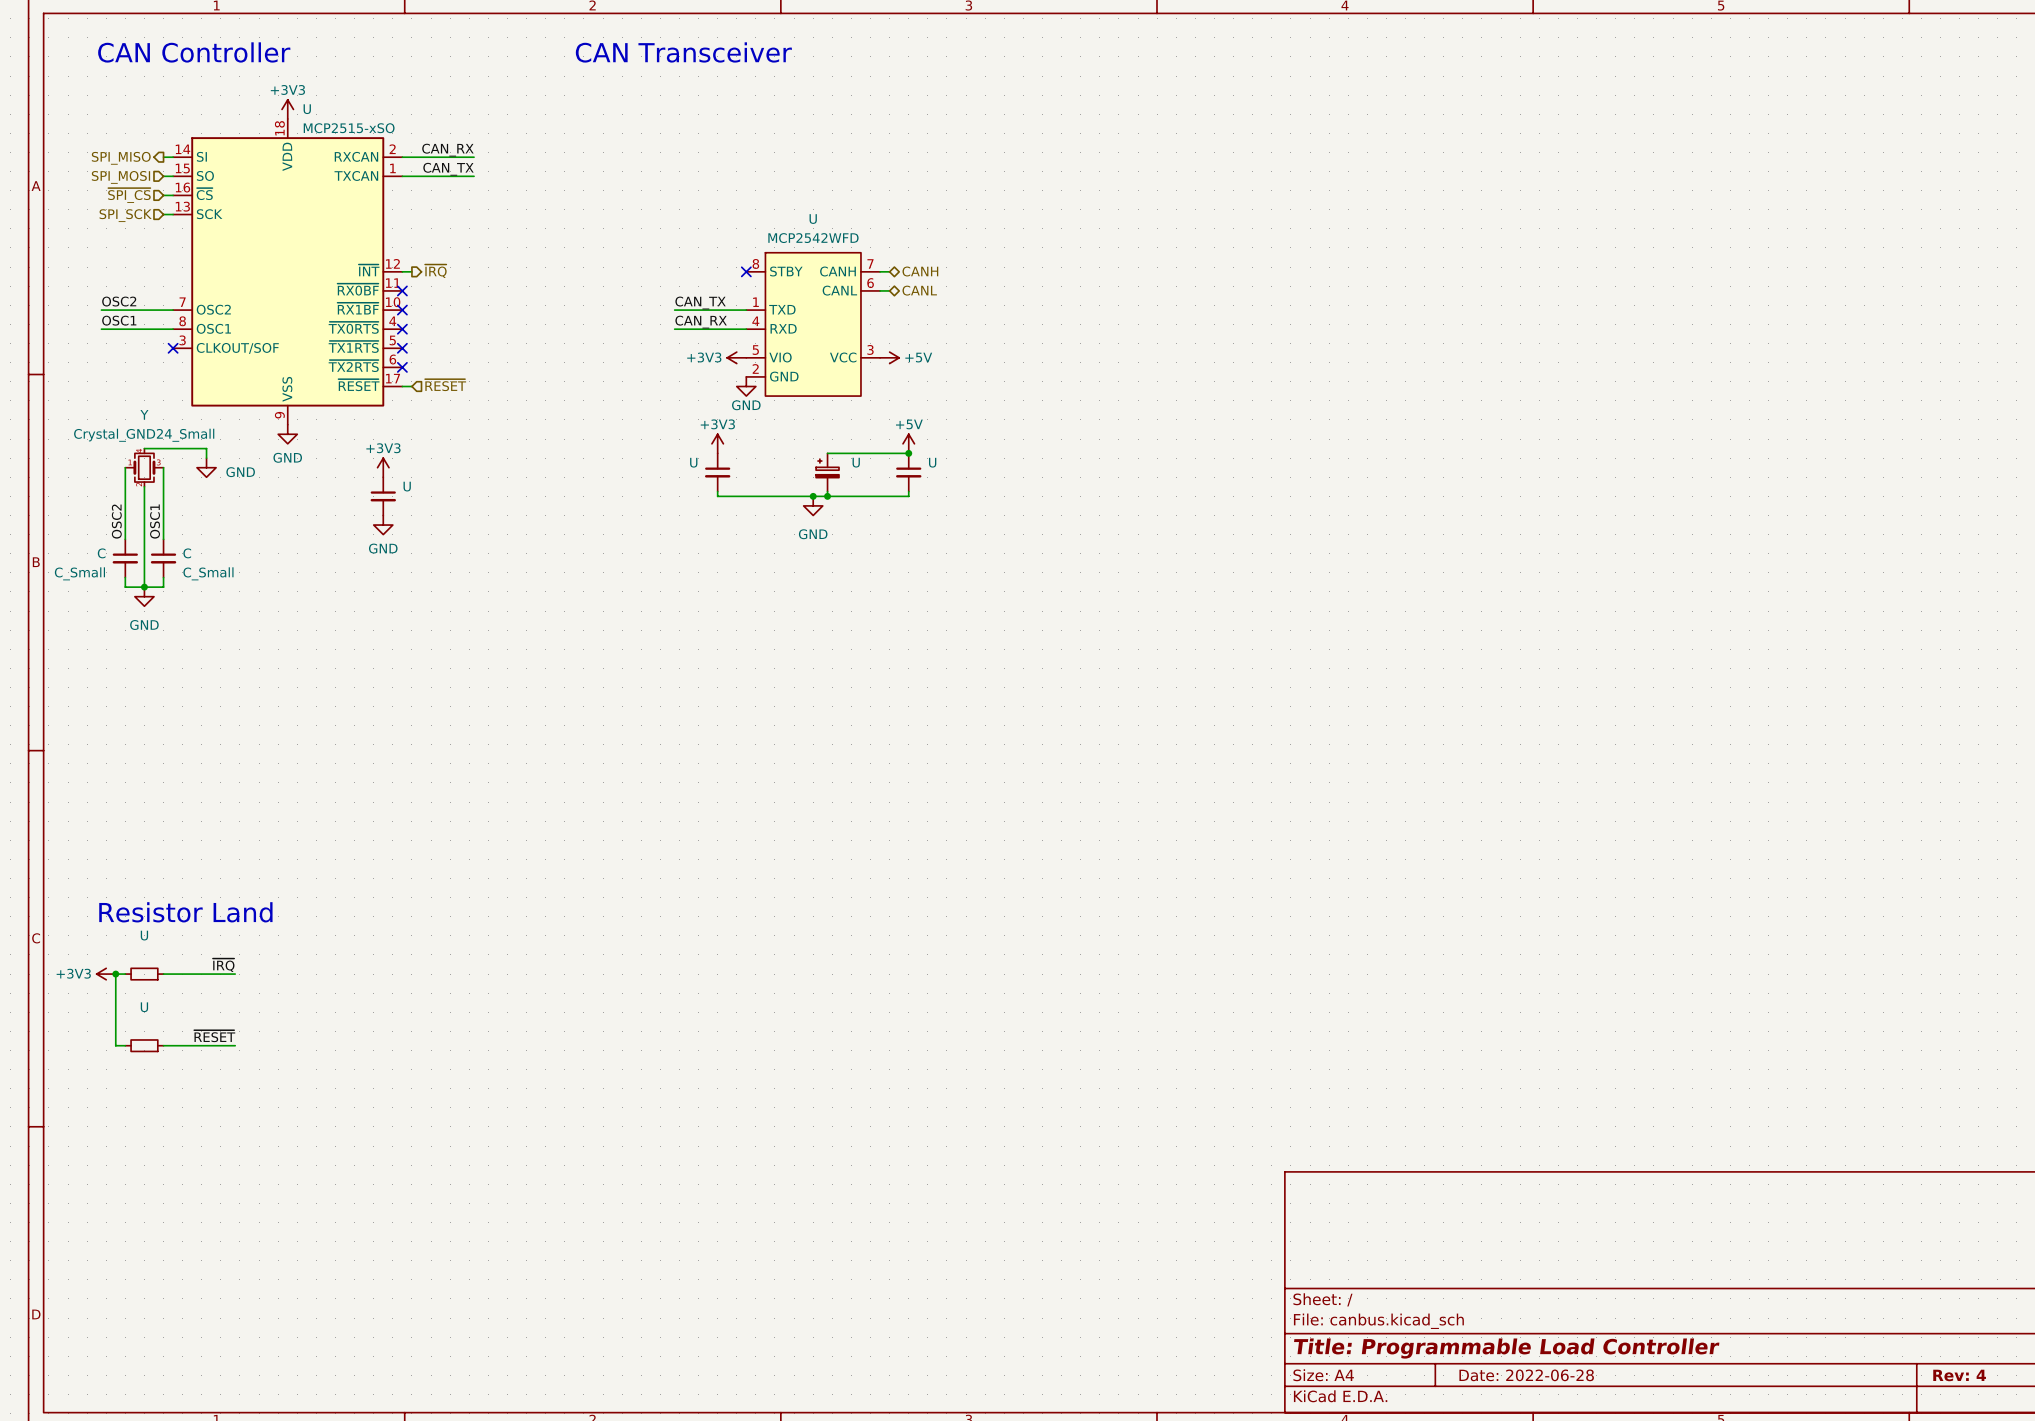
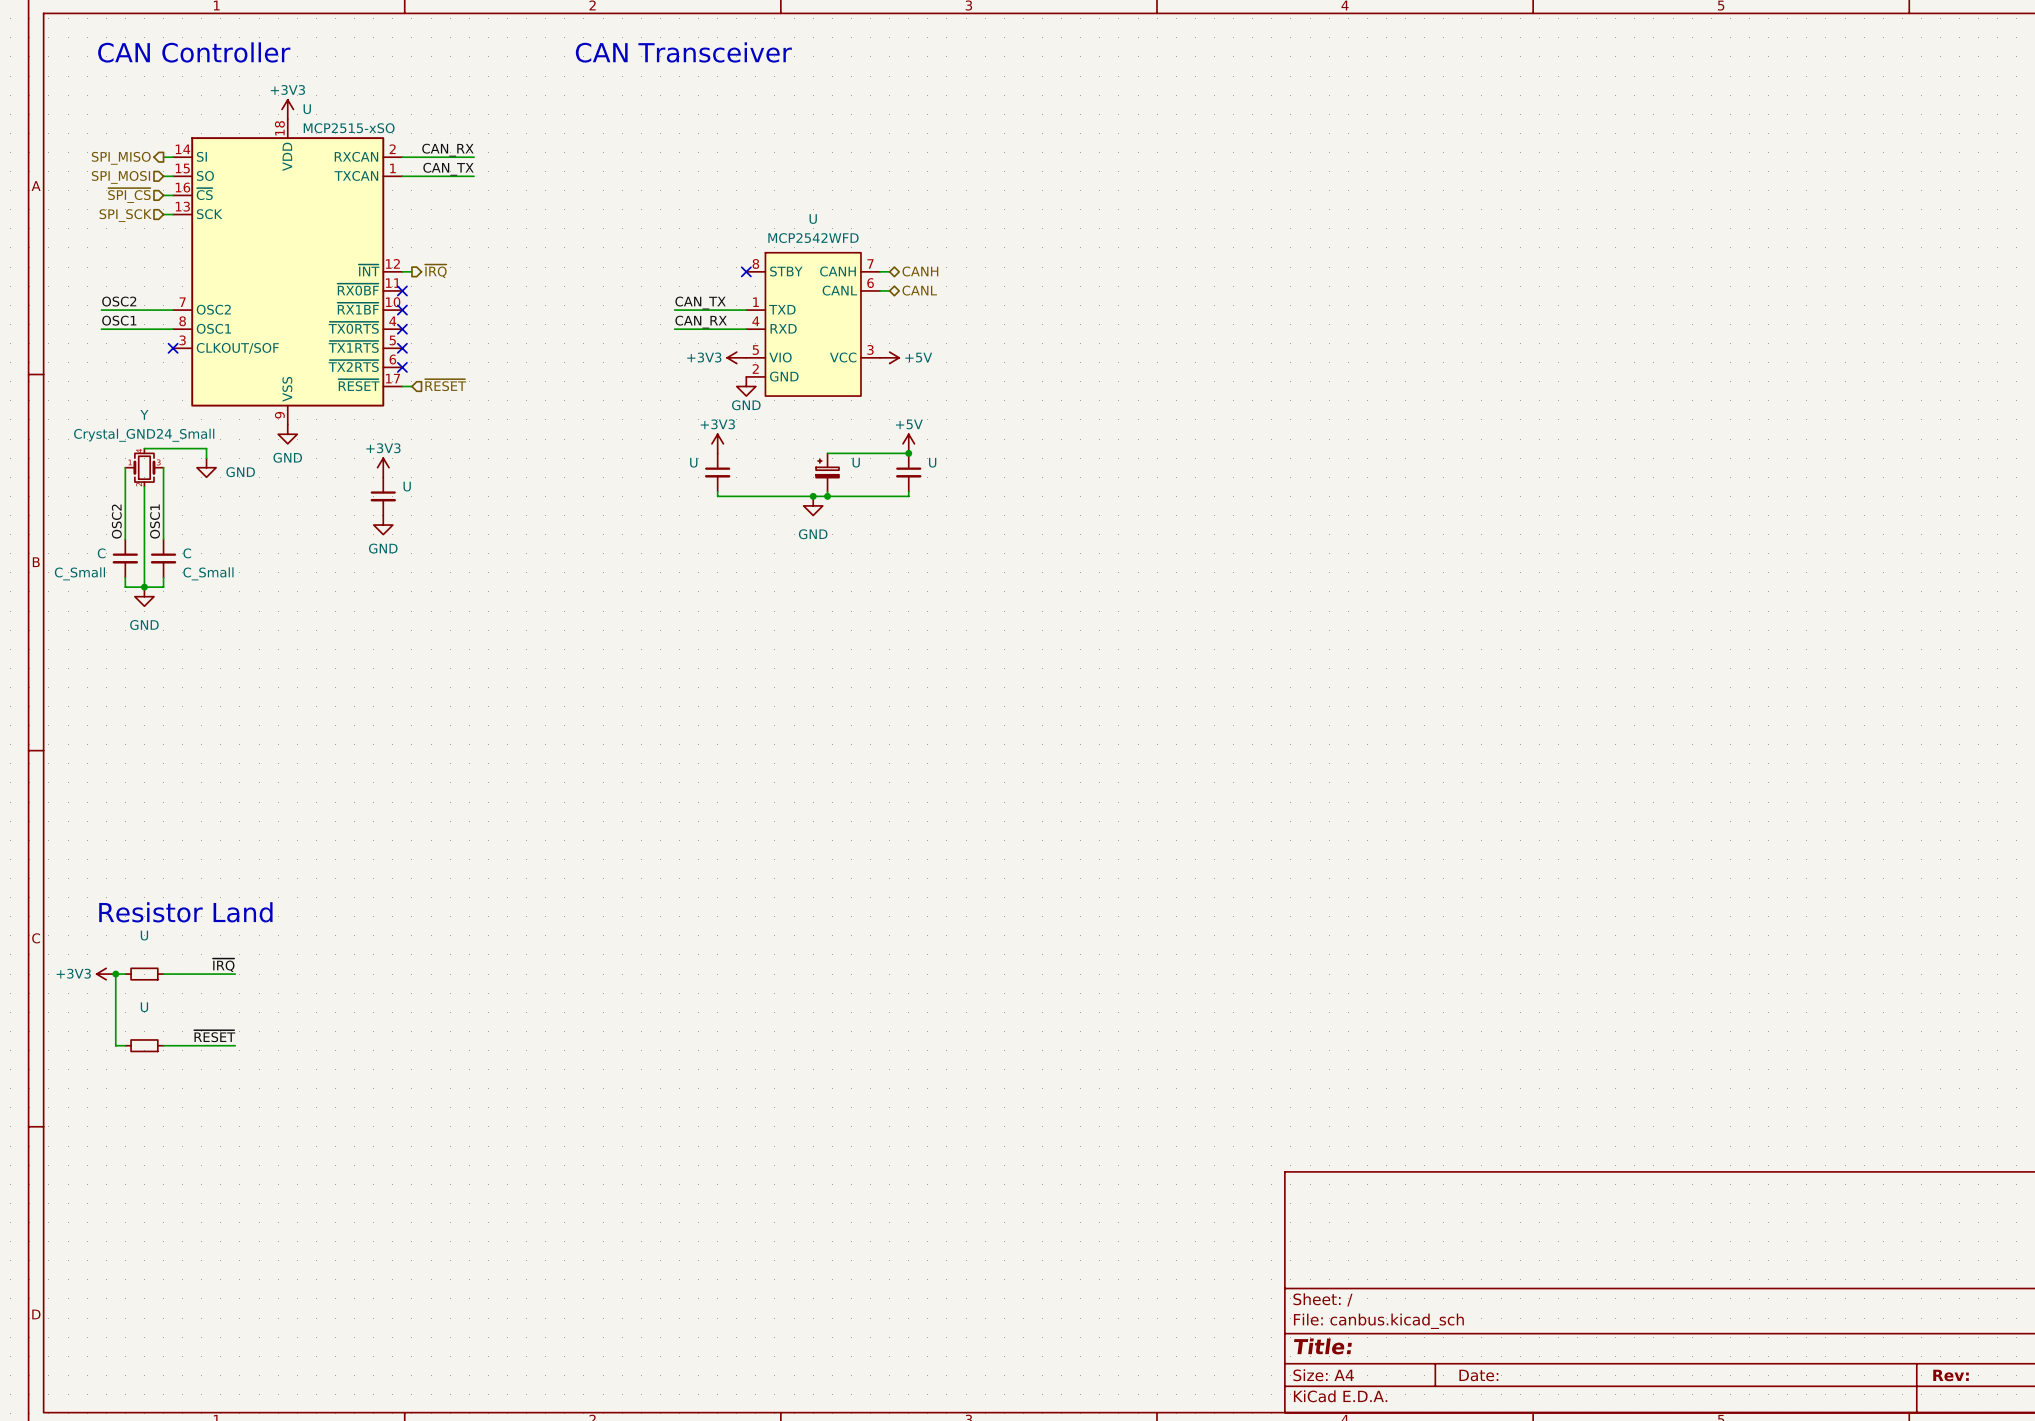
title block: Title: Programmable Load Controller (1506, 1348) -> Title: (1322, 1346)
title block: Date: 2022-06-28 (1526, 1375) -> Date: (1478, 1375)
title block: Rev: 4 (1959, 1375) -> Rev: (1951, 1375)

